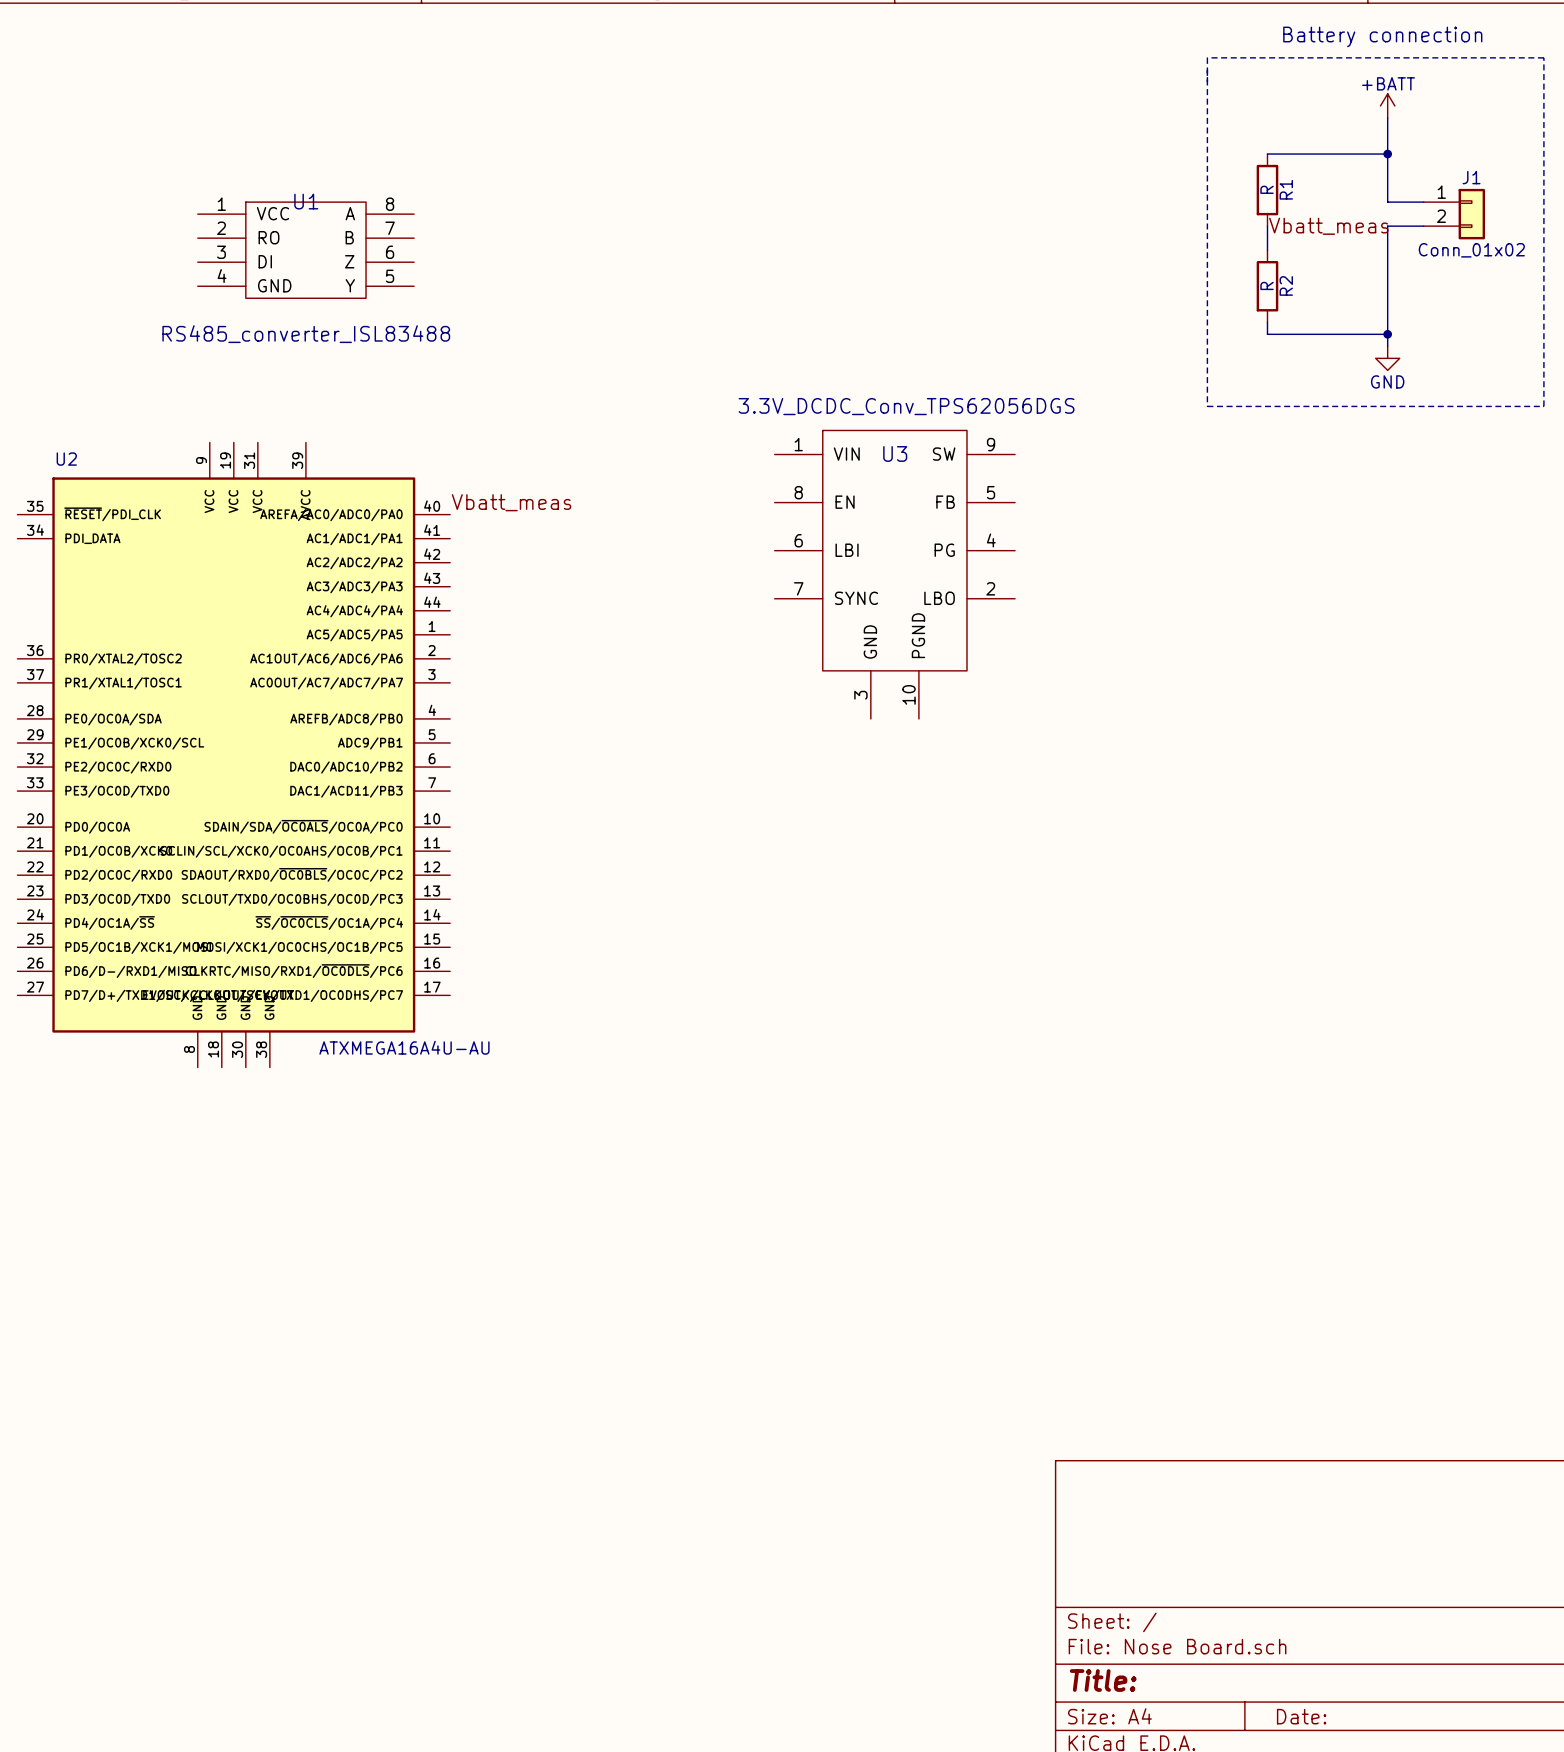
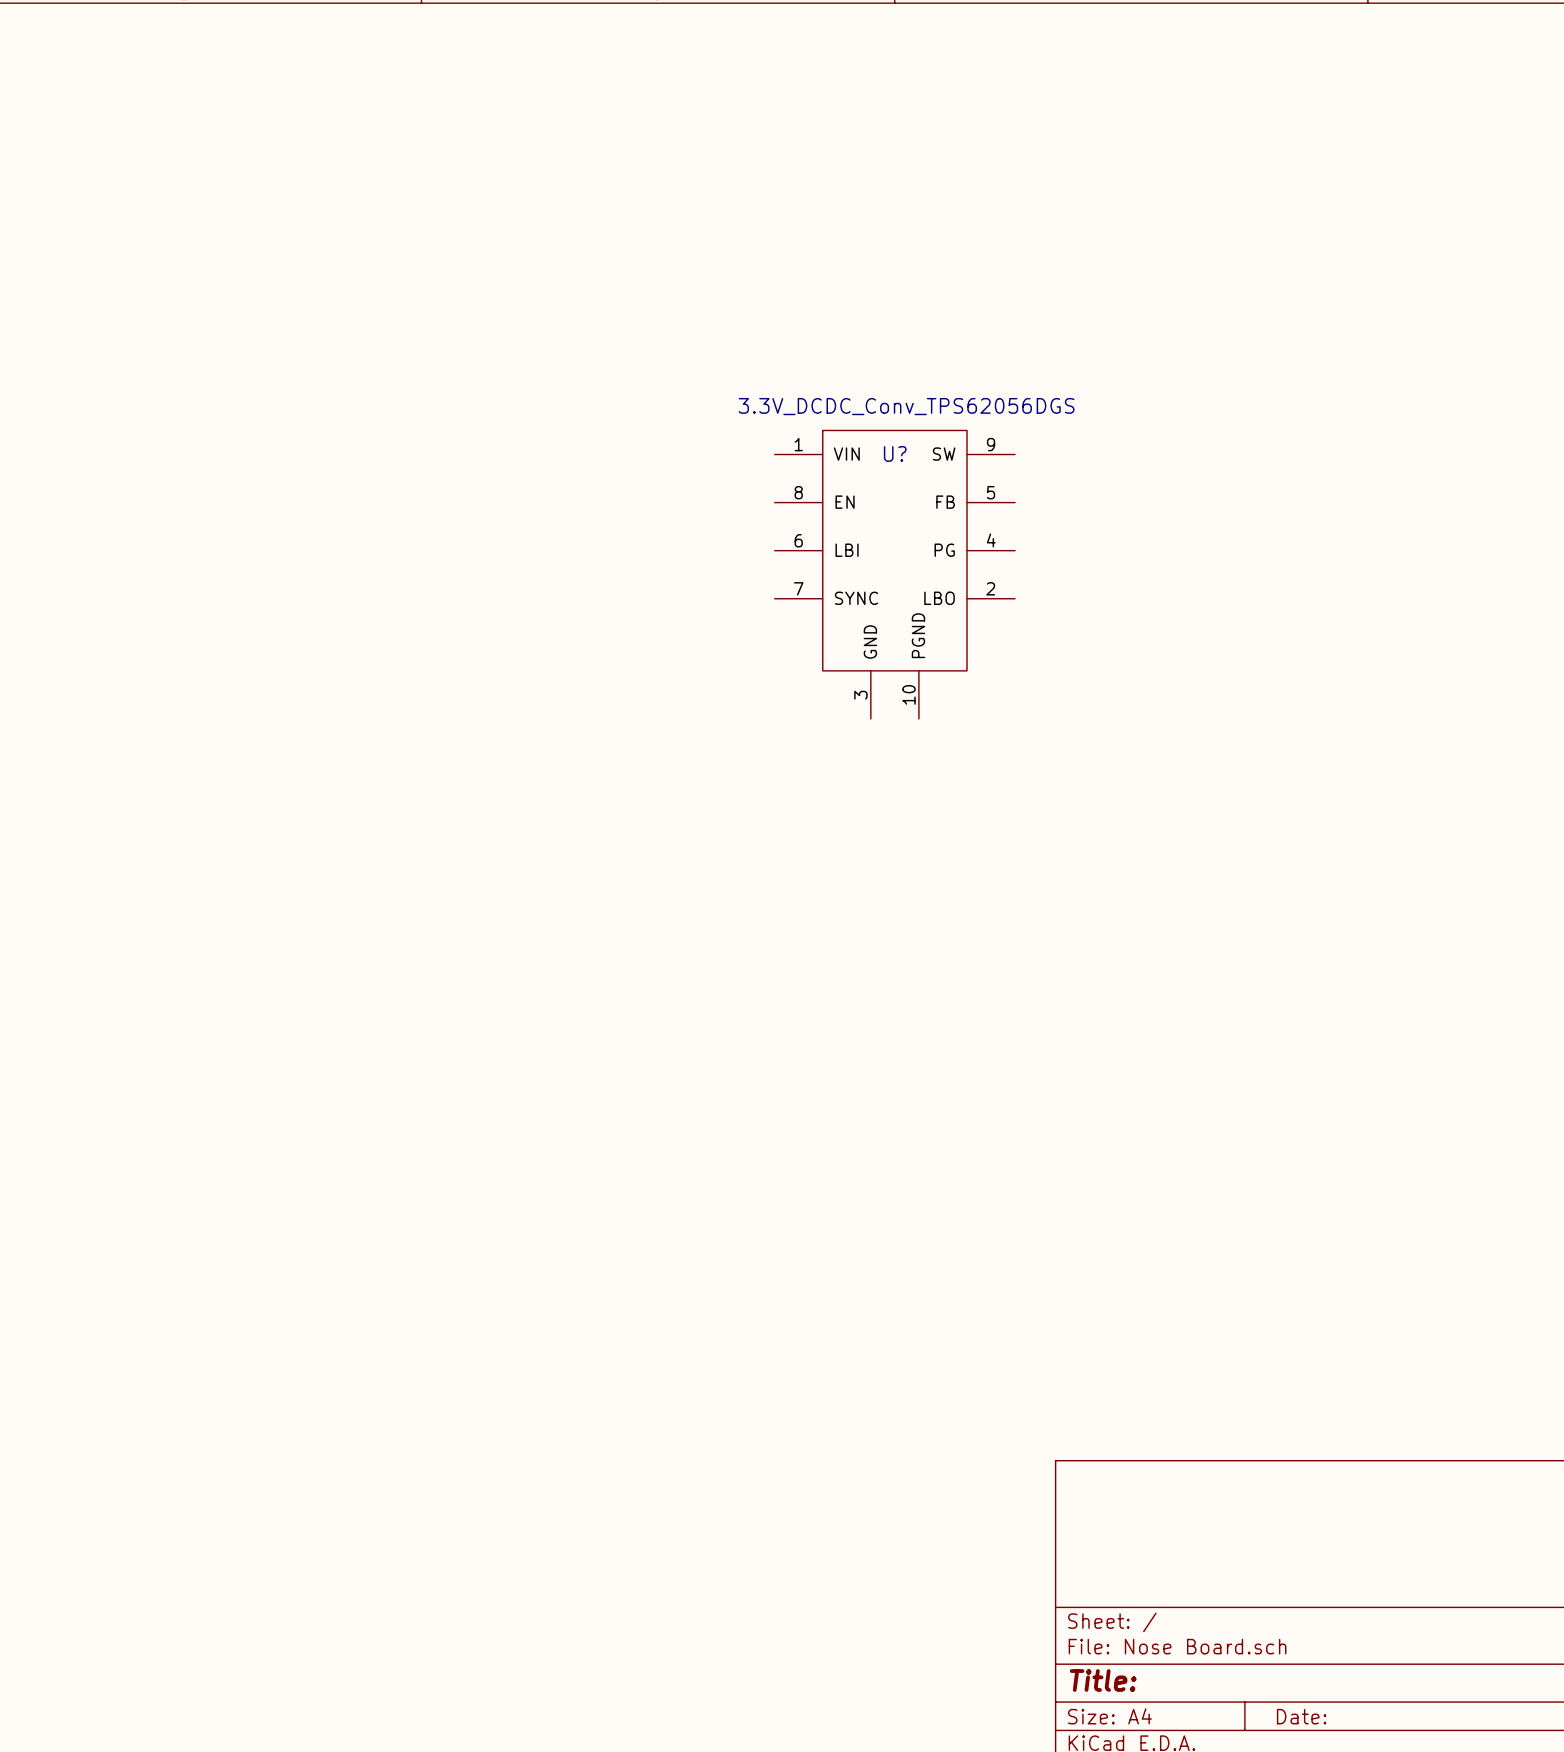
text: Battery connection (1382, 36) -> none
line: (1207, 57) (1207, 406) (1543, 406) (1543, 57) (1207, 57) -> none
power symbol: +BATT (1387, 105) -> none
wire: (1387, 117) (1387, 202) (1423, 202) -> none
wire: (1267, 154) (1387, 154) -> none
junction: (1387, 154) -> none
R1: R (1267, 190) -> none
J1: Conn_01x02 (1454, 214) -> none
wire: (1267, 226) (1267, 250) -> none
label: Vbatt_meas (1328, 226) -> none
wire: (1423, 226) (1387, 226) (1387, 346) -> none
U1: RS485_converter_ISL83488 (305, 250) -> none
R2: R (1267, 286) -> none
wire: (1267, 322) (1267, 334) (1387, 334) -> none
junction: (1387, 334) -> none
power symbol: GND (1387, 358) -> none
U3 name: U3 (895, 453) -> U? (895, 453)
label: Vbatt_meas (511, 502) -> none
U2: ATXMEGA16A4U-AU (233, 755) -> none

